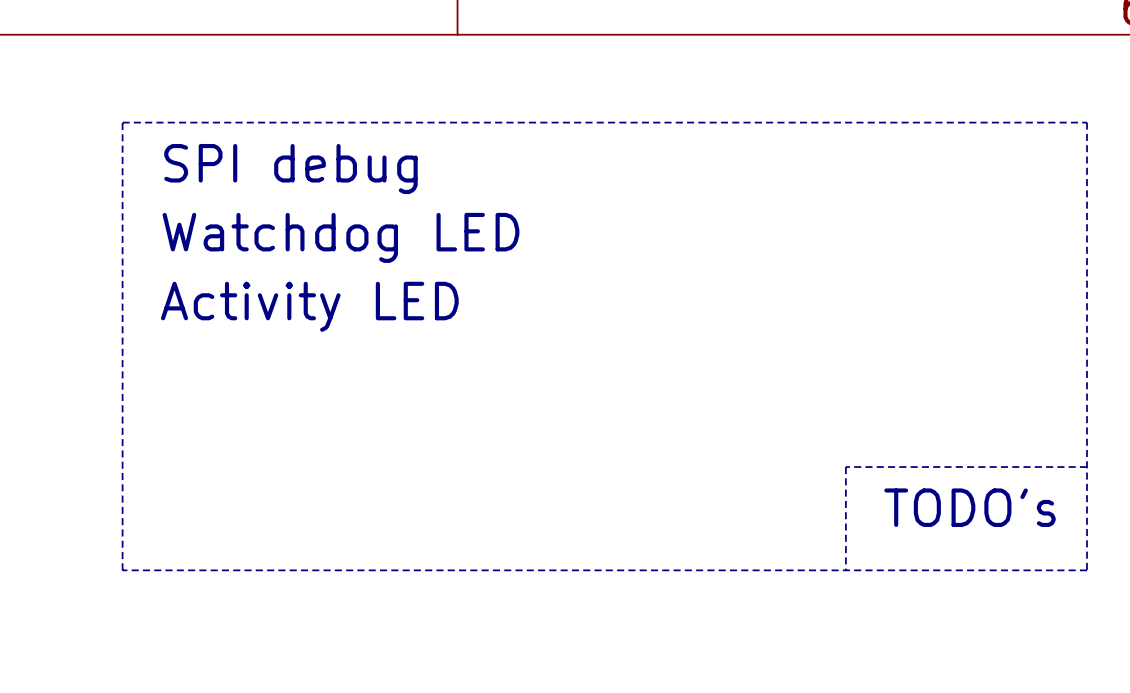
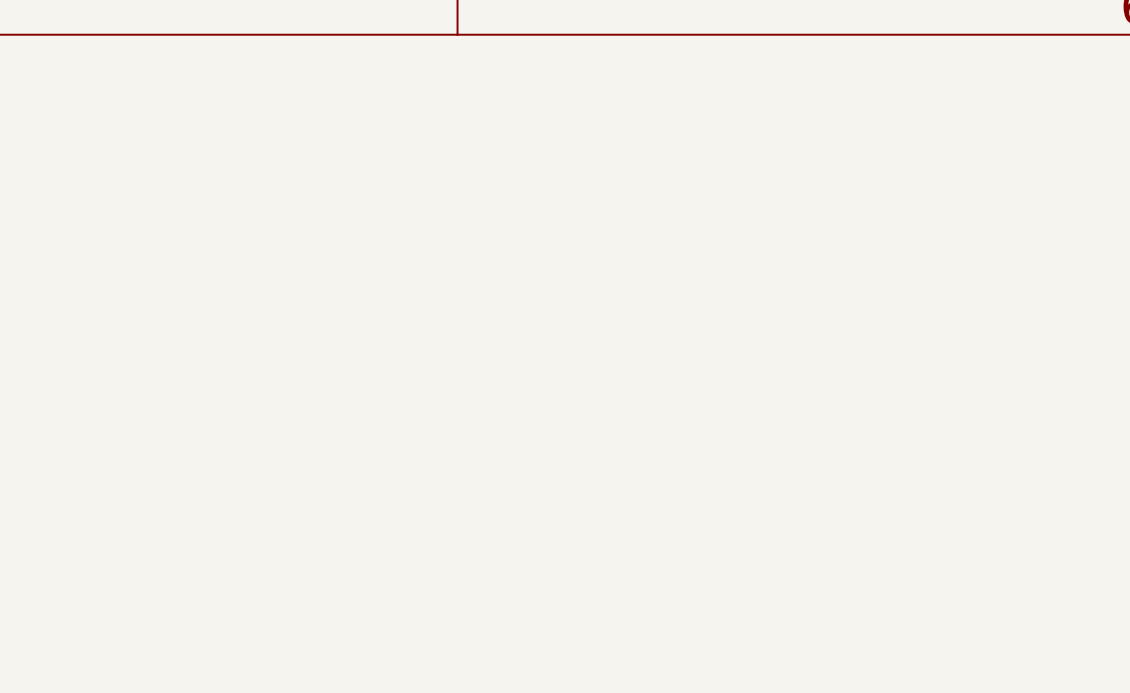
line: (122, 122) (1087, 122) (1087, 570) (122, 570) (122, 122) -> none
text: SPI debug (290, 169) -> none
text: Watchdog LED (340, 237) -> none
text: Activity LED (309, 306) -> none
line: (1087, 467) (845, 467) (845, 570) -> none
text: TODO's (970, 507) -> none

